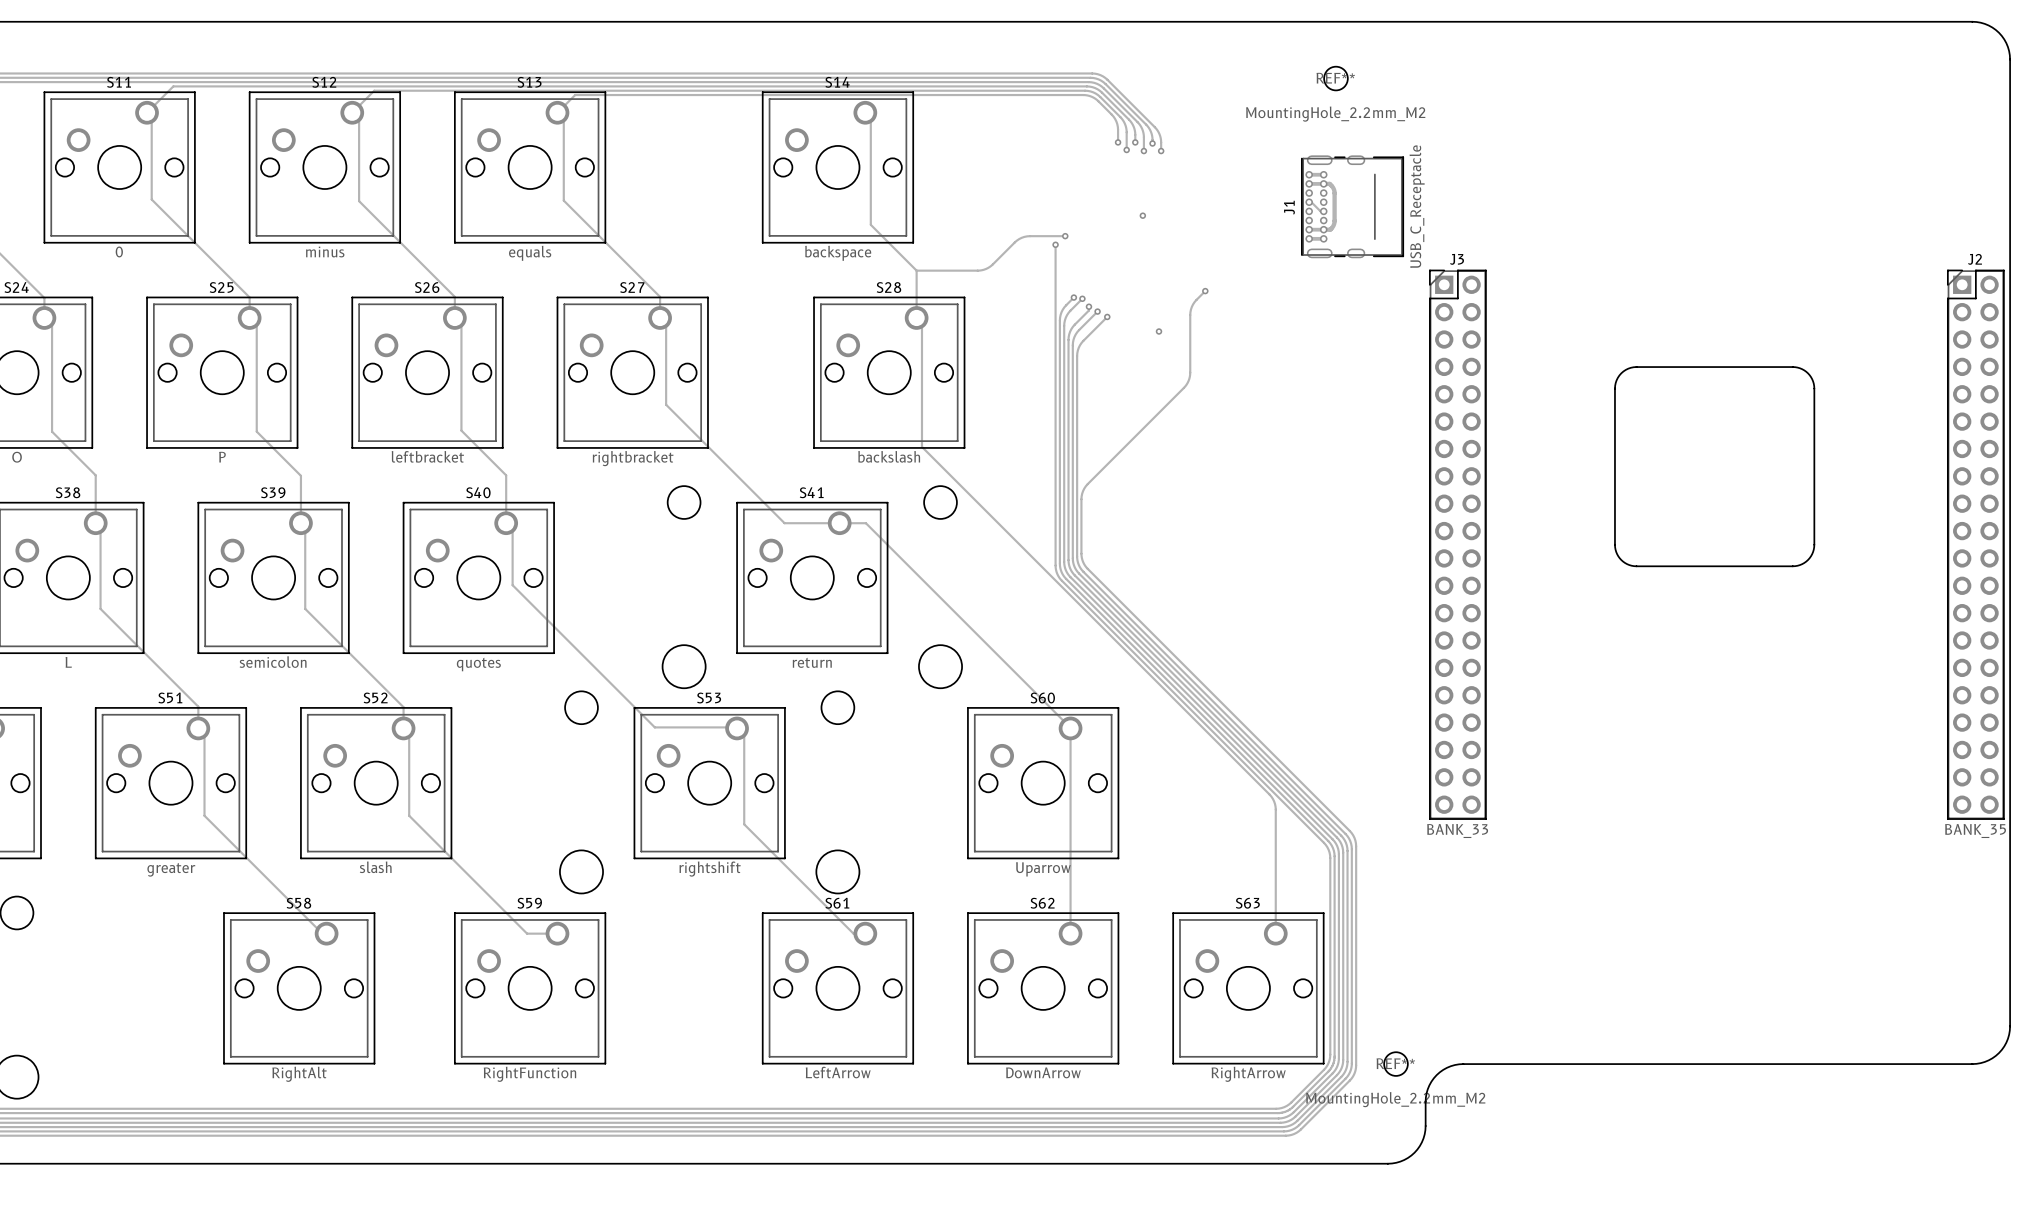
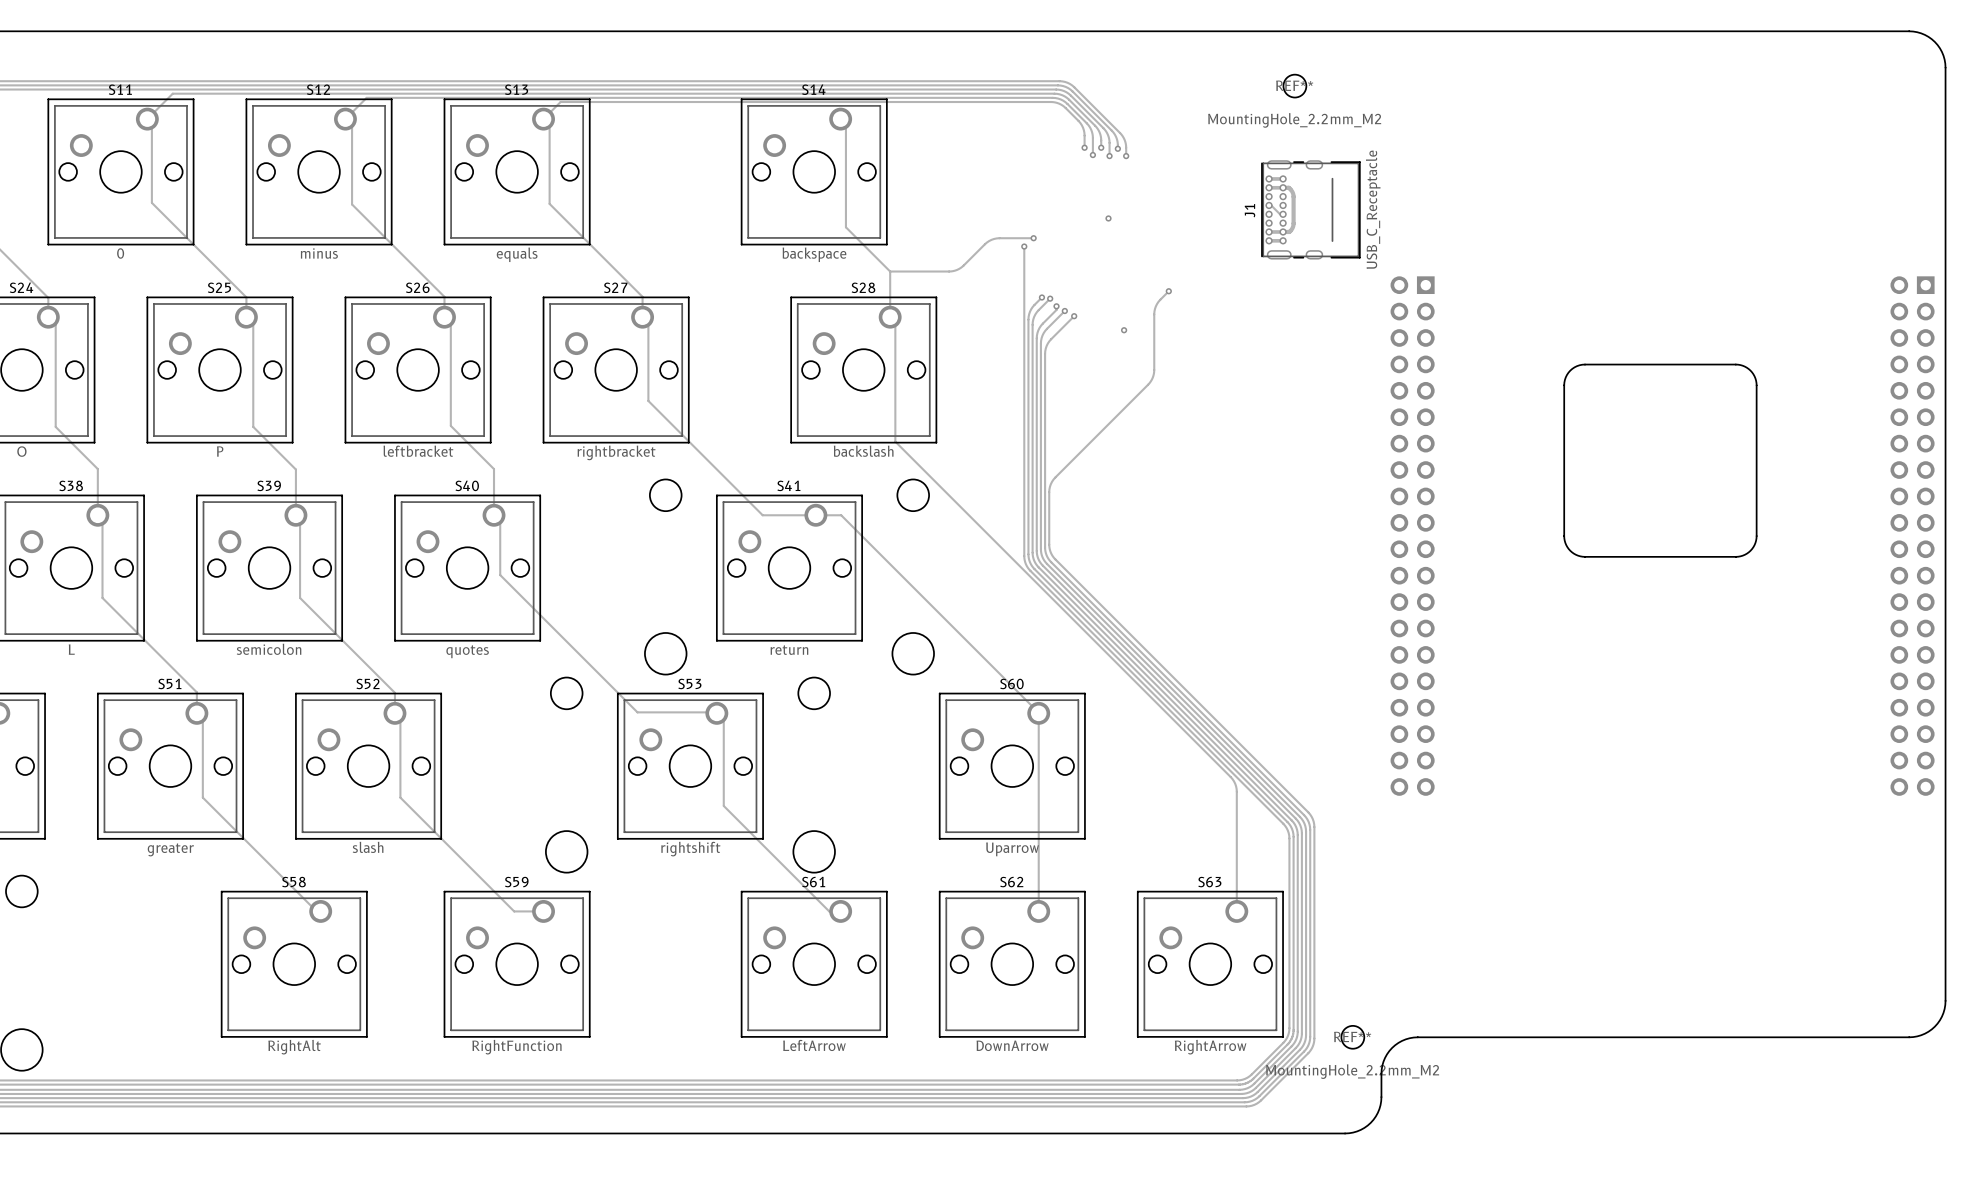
J3 side: top (1457, 544) -> bottom (1412, 536)
J2 side: top (1975, 544) -> bottom (1912, 536)

